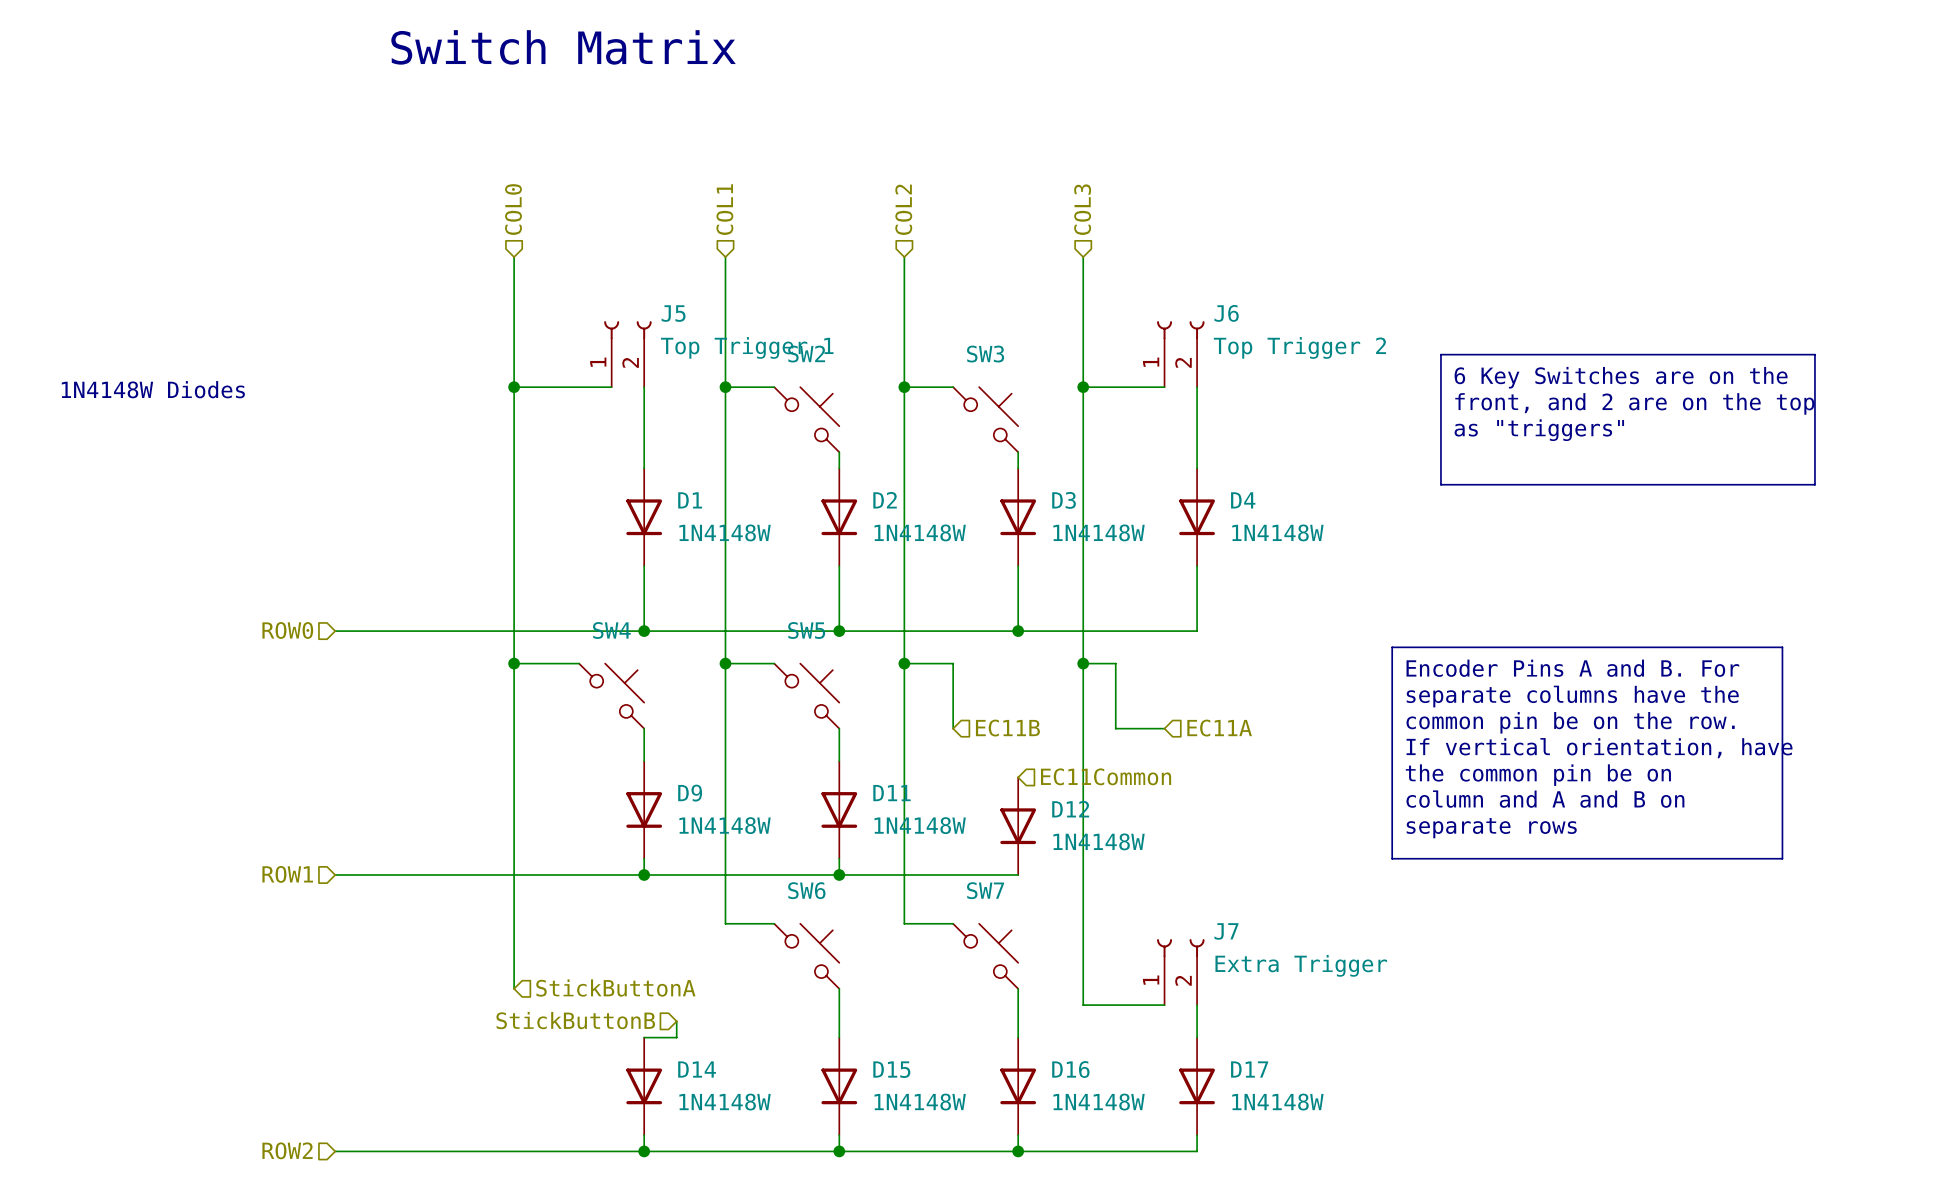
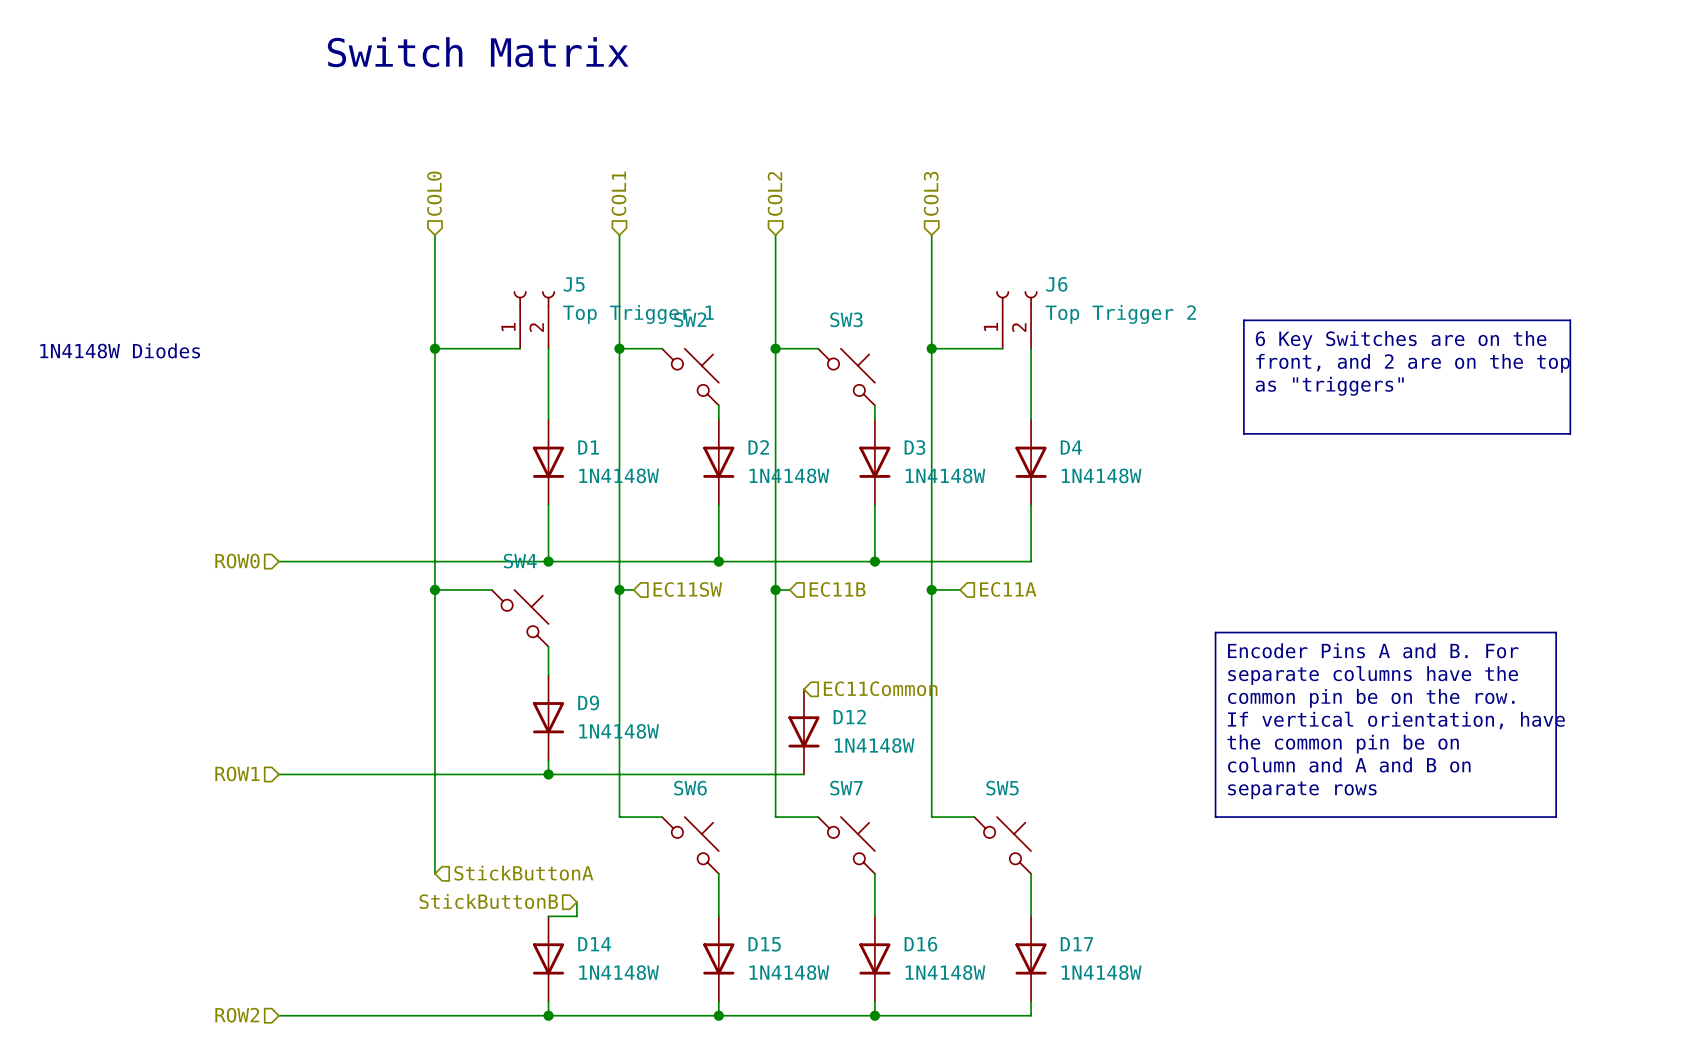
line: (1392, 647) (1782, 647) (1782, 858) (1392, 858) (1392, 647) -> (1215, 632) (1556, 632) (1556, 817) (1215, 817) (1215, 632)
wire: (741, 663) (774, 663) -> none
hierarchical label: none -> EC11SW (687, 589)
wire: (920, 663) (953, 663) (953, 728) -> none
wire: (1115, 663) (1115, 728) (1164, 728) -> none
text position: Encoder Pins A and B. For (1572, 668) -> Encoder Pins A and B. For (1373, 650)
SW5 position: (806, 696) -> (1002, 845)
text position: separate columns have the (1572, 696) -> separate columns have the (1373, 675)
text position: common pin be on the row. (1570, 722) -> common pin be on the row. (1371, 698)
wire: (839, 728) (839, 761) -> none
hierarchical label position: EC11B (1007, 728) -> EC11B (837, 589)
hierarchical label position: EC11A (1219, 728) -> EC11A (1008, 589)
text position: If vertical orientation, have (1599, 748) -> If vertical orientation, have (1396, 720)
text position: the common pin be on (1538, 775) -> the common pin be on (1343, 744)
hierarchical label position: EC11Common (1106, 776) -> EC11Common (880, 688)
text position: column and A and B on (1545, 799) -> column and A and B on (1349, 764)
D11: 1N4148W (839, 809) -> none
D12 position: (1018, 826) -> (803, 731)
text position: separate rows (1491, 828) -> separate rows (1302, 790)
wire: (839, 858) (839, 874) -> none
junction: (839, 874) -> none
wire: (936, 874) (1018, 874) -> none
wire: (1083, 923) (1083, 1005) (1164, 1005) -> (931, 817) (974, 817)
J7: Extra Trigger (1180, 972) -> none

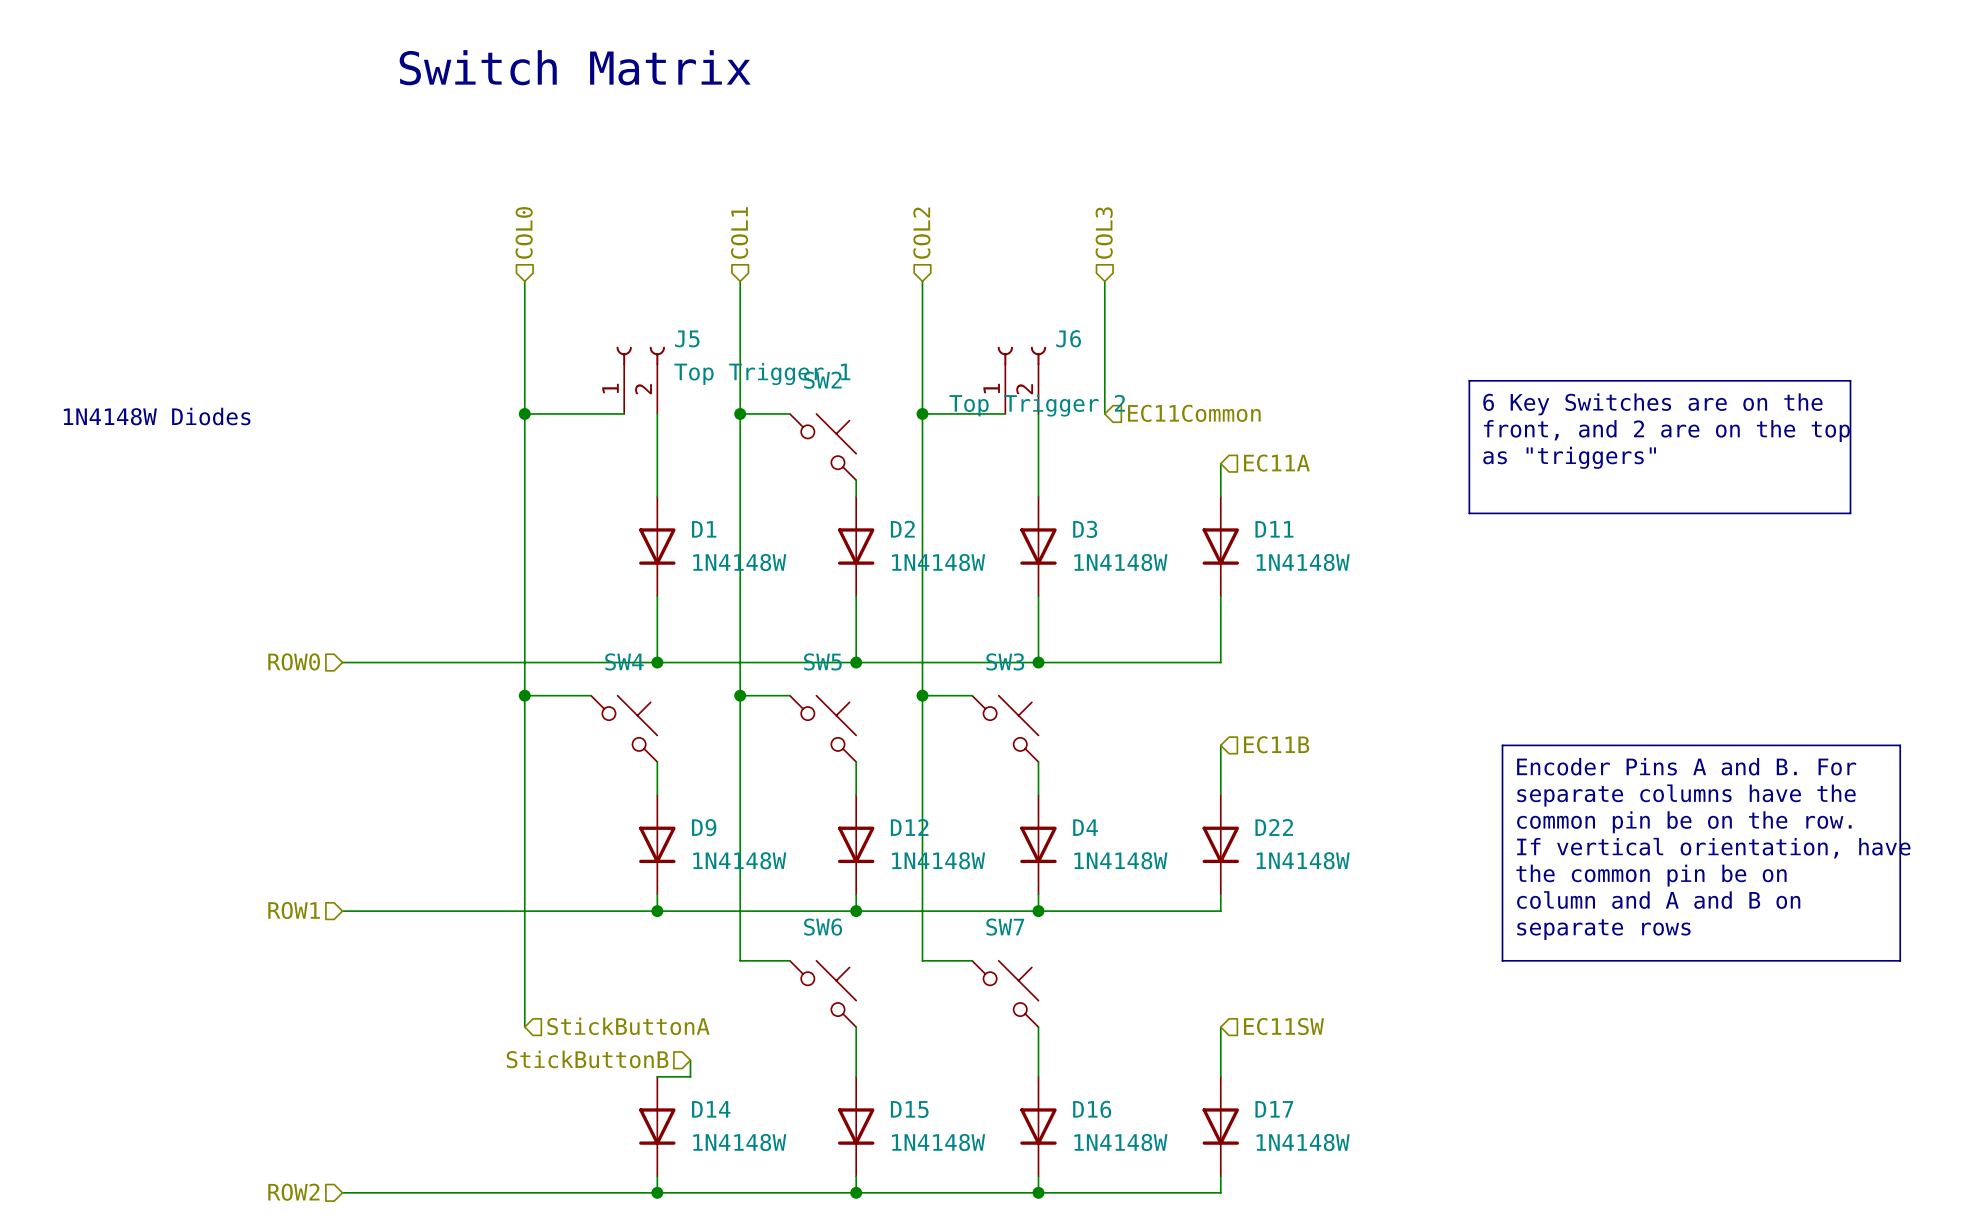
J6 value position: Top Trigger 2 (1120, 314) -> Top Trigger 2 (1037, 405)
J6 position: (1016, 319) -> (1021, 380)
wire: none -> (972, 413) (1005, 413)
wire: none -> (1038, 413) (1038, 480)
junction: (931, 348) -> none
wire: (1002, 348) (931, 348) (931, 817) (974, 817) -> none
hierarchical label: none -> EC11Common (1194, 413)
wire: (1031, 348) (1031, 391) -> none
SW3 position: (846, 377) -> (1005, 728)
D4 name: D4 (1071, 447) -> D11 (1274, 529)
wire: none -> (756, 695) (789, 695)
hierarchical label: EC11SW (687, 589) -> none
hierarchical label position: EC11B (837, 589) -> EC11B (1276, 744)
wire: (931, 589) (960, 589) -> (939, 695) (972, 695)
junction: (931, 589) -> none
hierarchical label position: EC11A (1008, 589) -> EC11A (1276, 463)
wire: none -> (1220, 745) (1220, 795)
line: (1272, 632) (1215, 632) (1215, 817) (1272, 817) -> (1502, 745) (1502, 960)
line: (1556, 632) (1556, 817) -> (1833, 745) (1900, 745) (1900, 960) (1833, 960)
wire: none -> (856, 761) (856, 795)
wire: none -> (1038, 761) (1038, 795)
text position: Encoder Pins A and B. For (1373, 650) -> Encoder Pins A and B. For (1686, 766)
text position: separate columns have the (1373, 675) -> separate columns have the (1686, 795)
hierarchical label: EC11Common (880, 688) -> none
text position: common pin be on the row. (1371, 698) -> common pin be on the row. (1684, 822)
D4: none -> 1N4148W (1038, 844)
D22: none -> 1N4148W (1220, 844)
text position: If vertical orientation, have (1396, 720) -> If vertical orientation, have (1713, 848)
D12 position: (803, 731) -> (856, 844)
text position: the common pin be on (1343, 744) -> the common pin be on (1651, 875)
wire: none -> (856, 894) (856, 911)
wire: none -> (1038, 894) (1038, 911)
wire: none -> (1220, 894) (1220, 911) (955, 911)
text position: column and A and B on (1349, 764) -> column and A and B on (1658, 900)
junction: none -> (856, 911)
junction: none -> (1038, 911)
text position: separate rows (1302, 790) -> separate rows (1603, 929)
SW5 position: (1002, 845) -> (823, 728)
hierarchical label: none -> EC11SW (1283, 1026)

